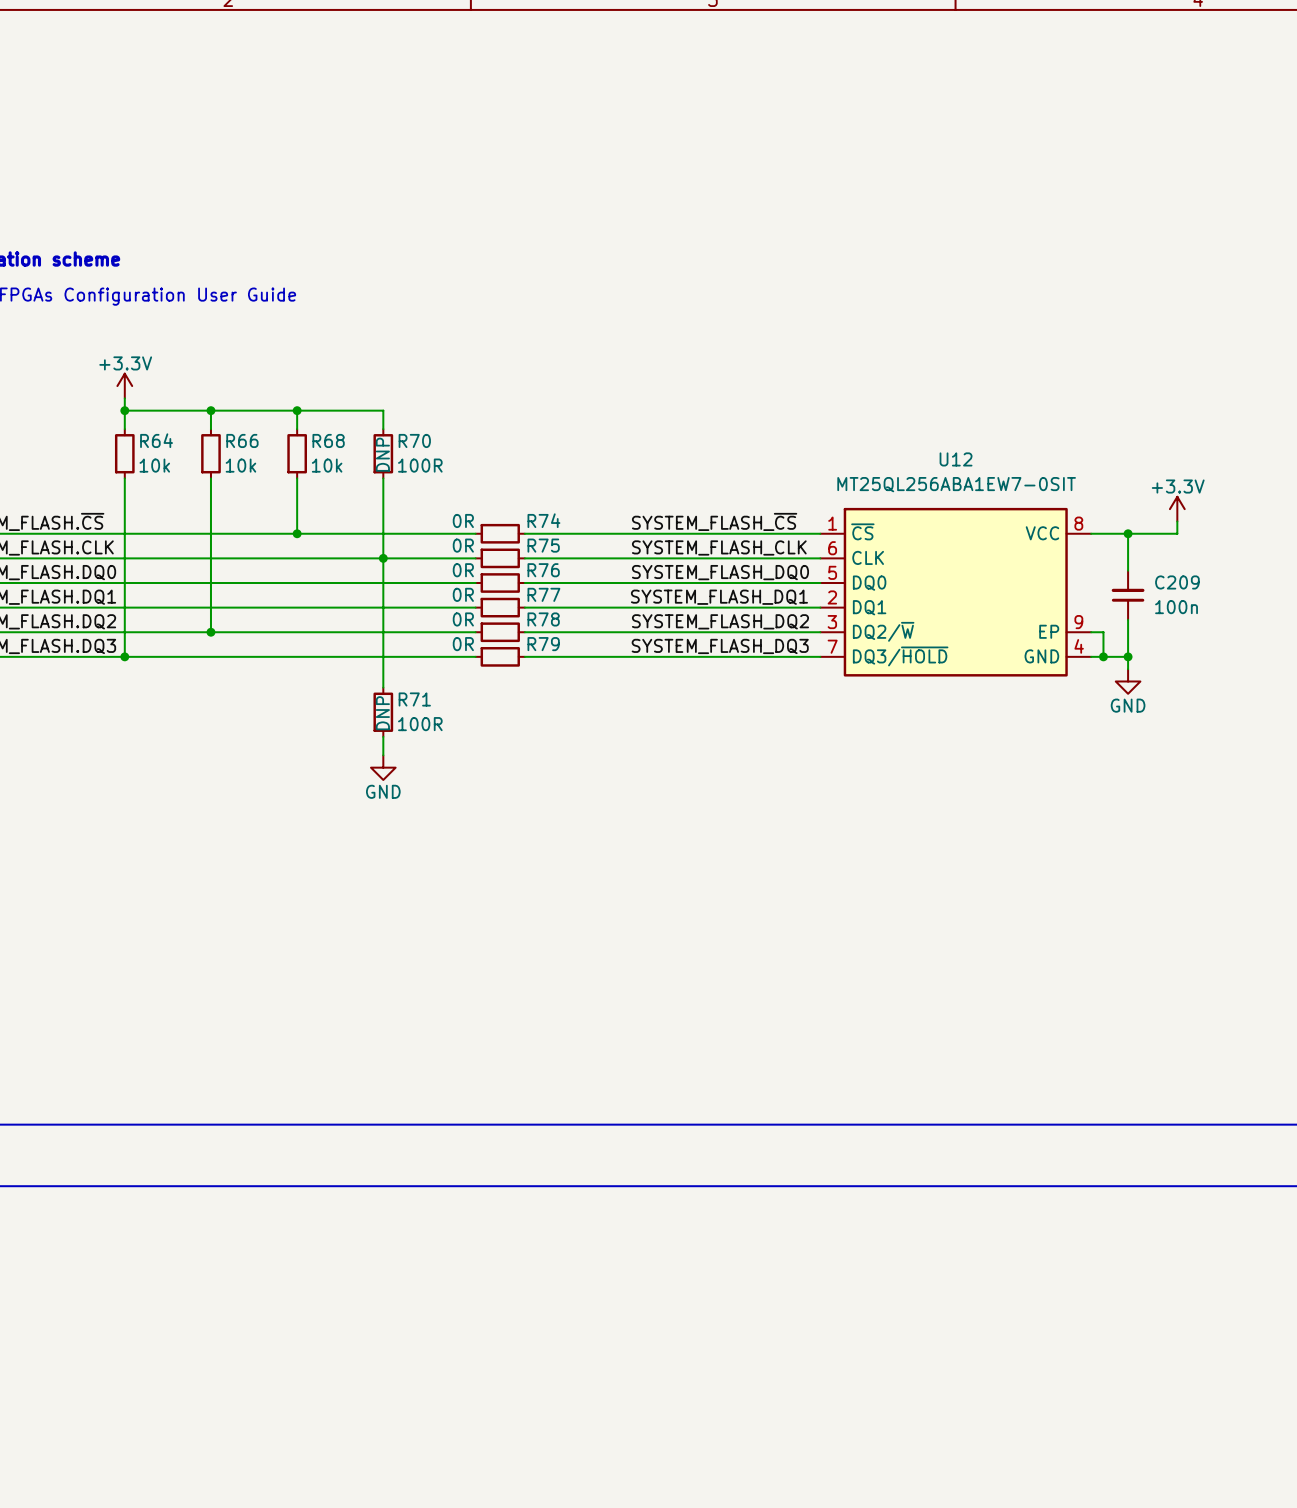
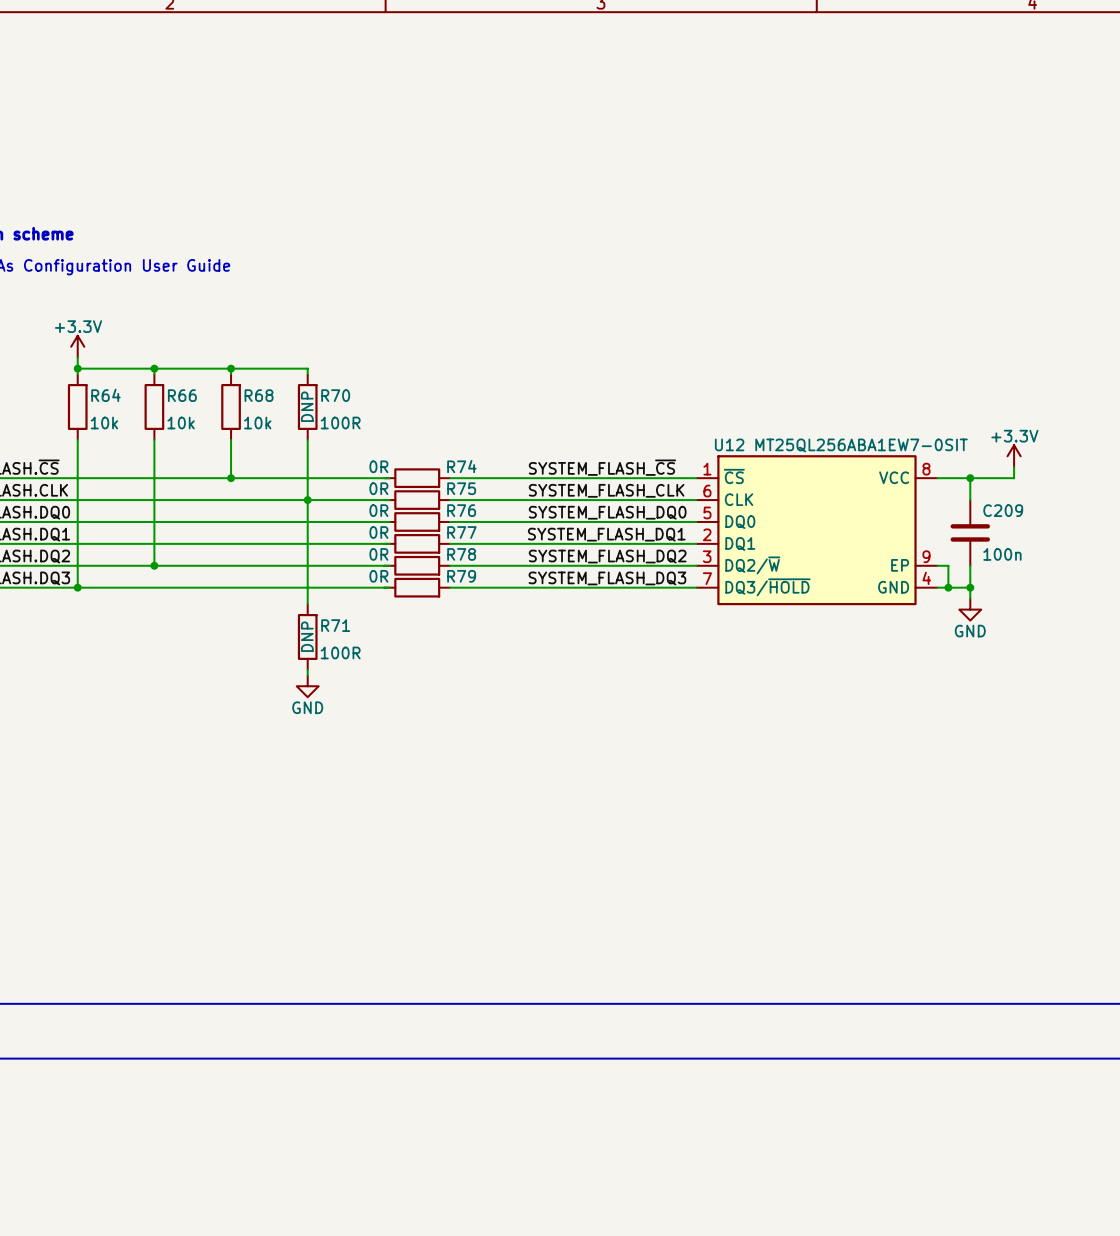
R64 symbol: [114, 429, 135, 479] -> [67, 374, 88, 440]
R66 symbol: [201, 429, 221, 479] -> [144, 374, 165, 440]
R68 symbol: [287, 429, 307, 479] -> [221, 374, 241, 440]
R70 symbol: [373, 429, 394, 479] -> [297, 374, 318, 440]
U12 name position: U12 (956, 459) -> U12 (729, 444)
U12 value position: MT25QL256ABA1EW7-0SIT (956, 484) -> MT25QL256ABA1EW7-0SIT (861, 445)
R74 symbol: [475, 523, 525, 544] -> [384, 468, 451, 489]
R75 symbol: [475, 548, 525, 569] -> [384, 490, 451, 510]
C209 symbol: [1111, 570, 1145, 620] -> [950, 500, 991, 566]
R76 symbol: [475, 573, 525, 593] -> [384, 512, 451, 532]
R77 symbol: [475, 597, 525, 618] -> [384, 534, 451, 554]
R78 symbol: [475, 622, 525, 643] -> [384, 555, 451, 576]
R79 symbol: [475, 647, 525, 667] -> [384, 577, 451, 598]
R71 symbol: [373, 687, 394, 737] -> [297, 604, 318, 670]

